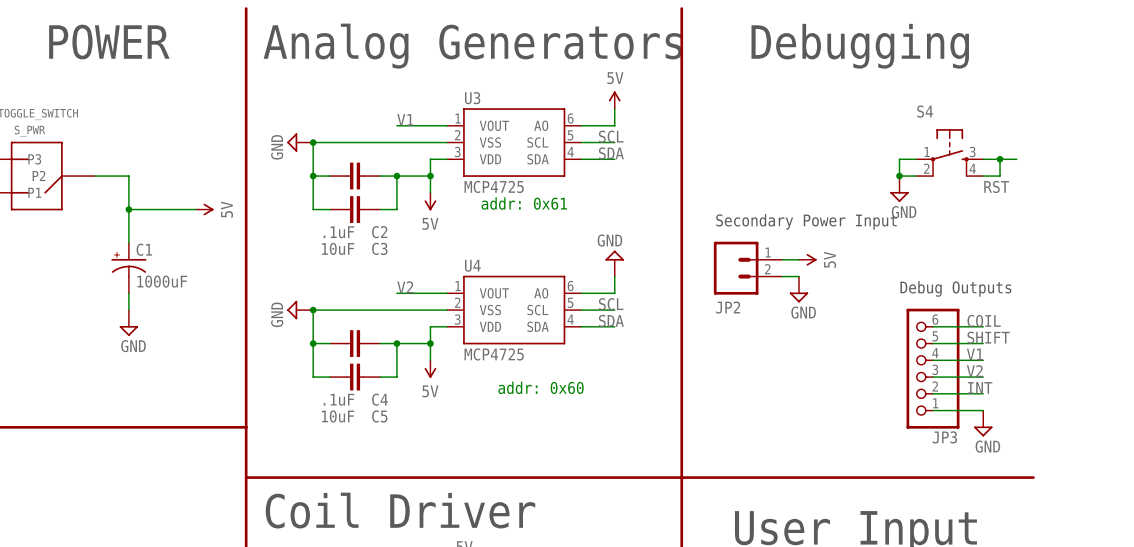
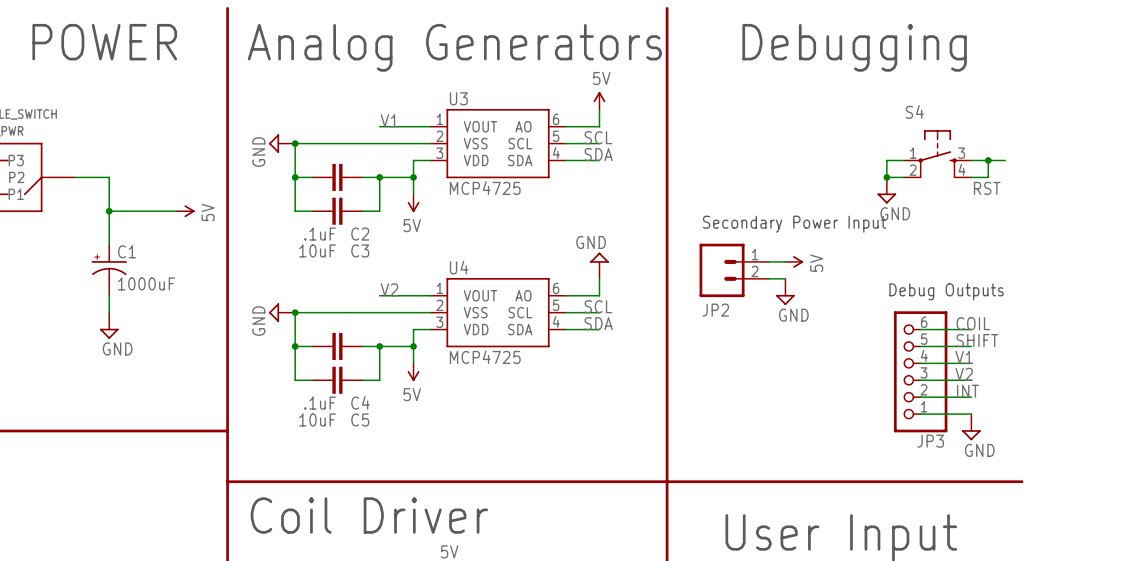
text: addr: 0x61 (524, 203) -> none
text: addr: 0x60 (541, 387) -> none

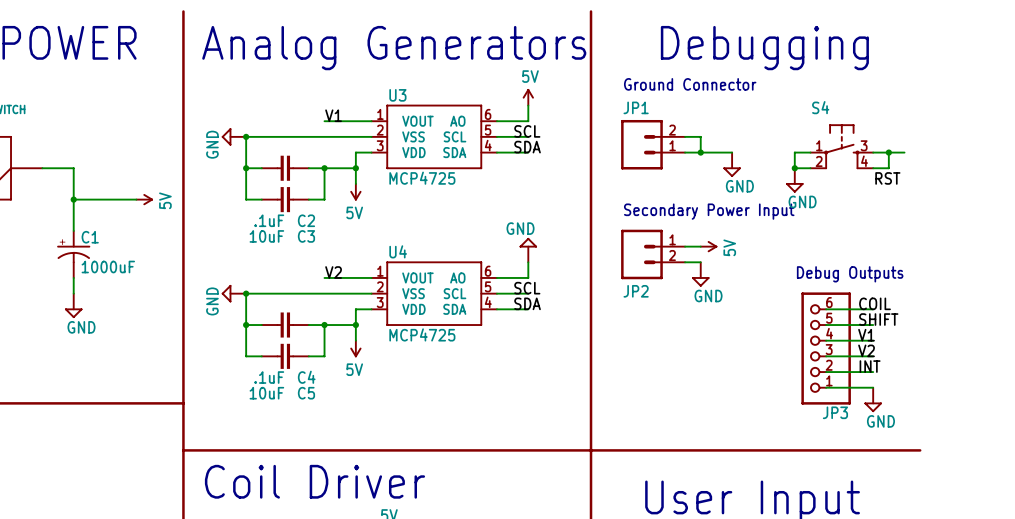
text: none -> Ground Connector (690, 84)
wire: none -> (685, 136) (700, 136) (700, 152)
JP1: none -> (653, 144)
wire: none -> (685, 152) (732, 152)
junction: none -> (700, 152)
power symbol: none -> GND (732, 164)

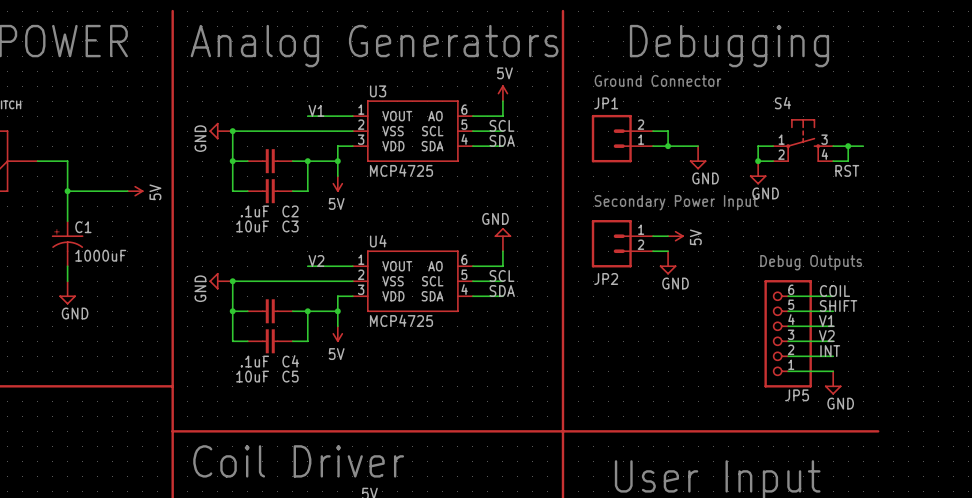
JP3 name: JP3 (835, 412) -> JP5 (797, 395)

